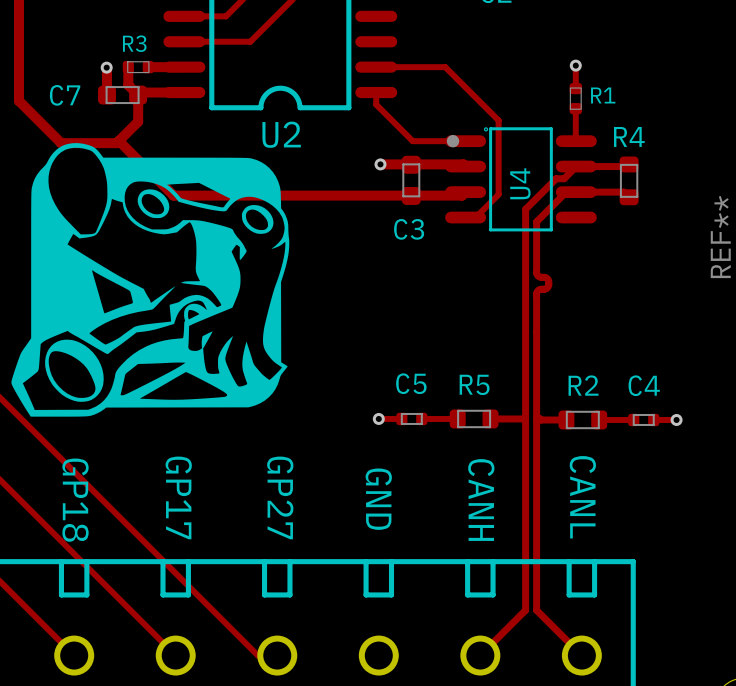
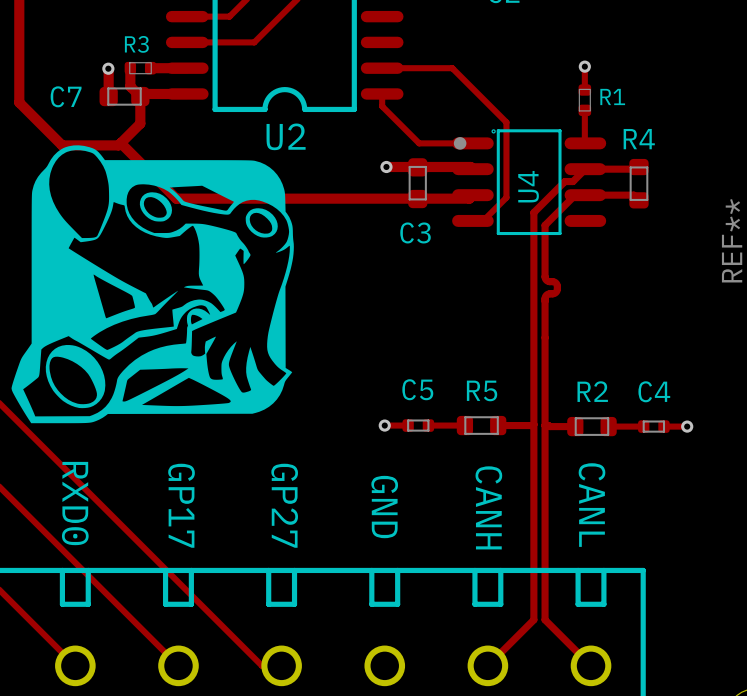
text: GP18 (75, 500) -> RXD0 (75, 503)

